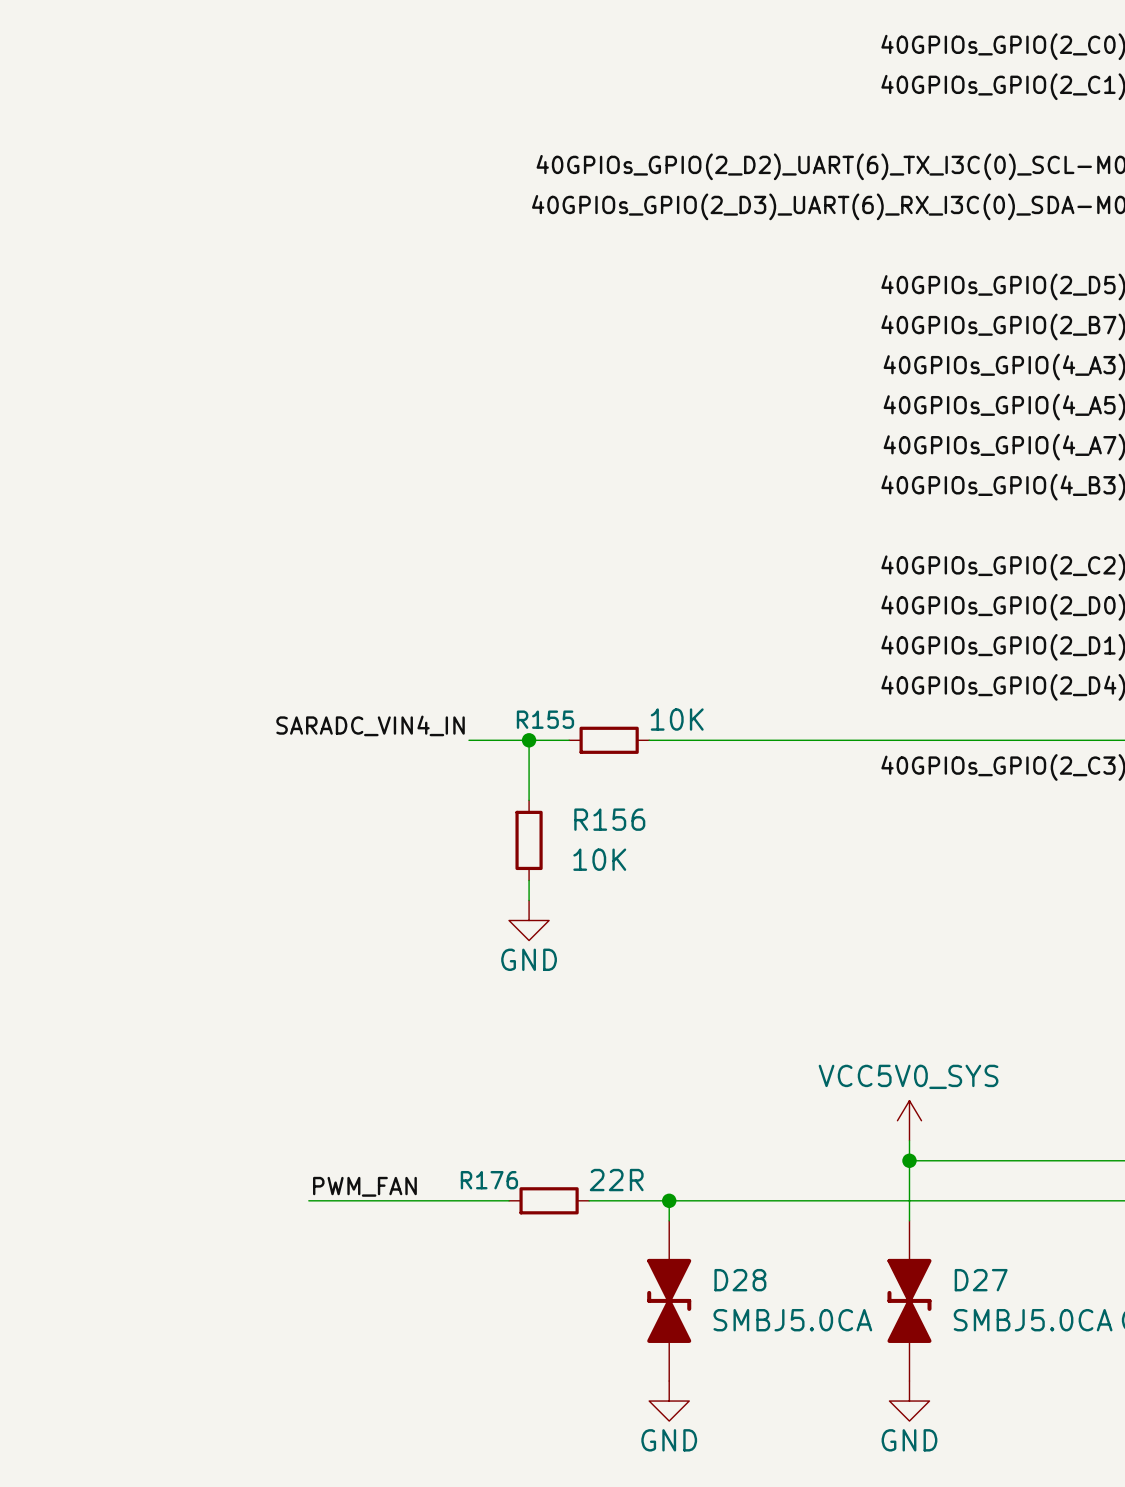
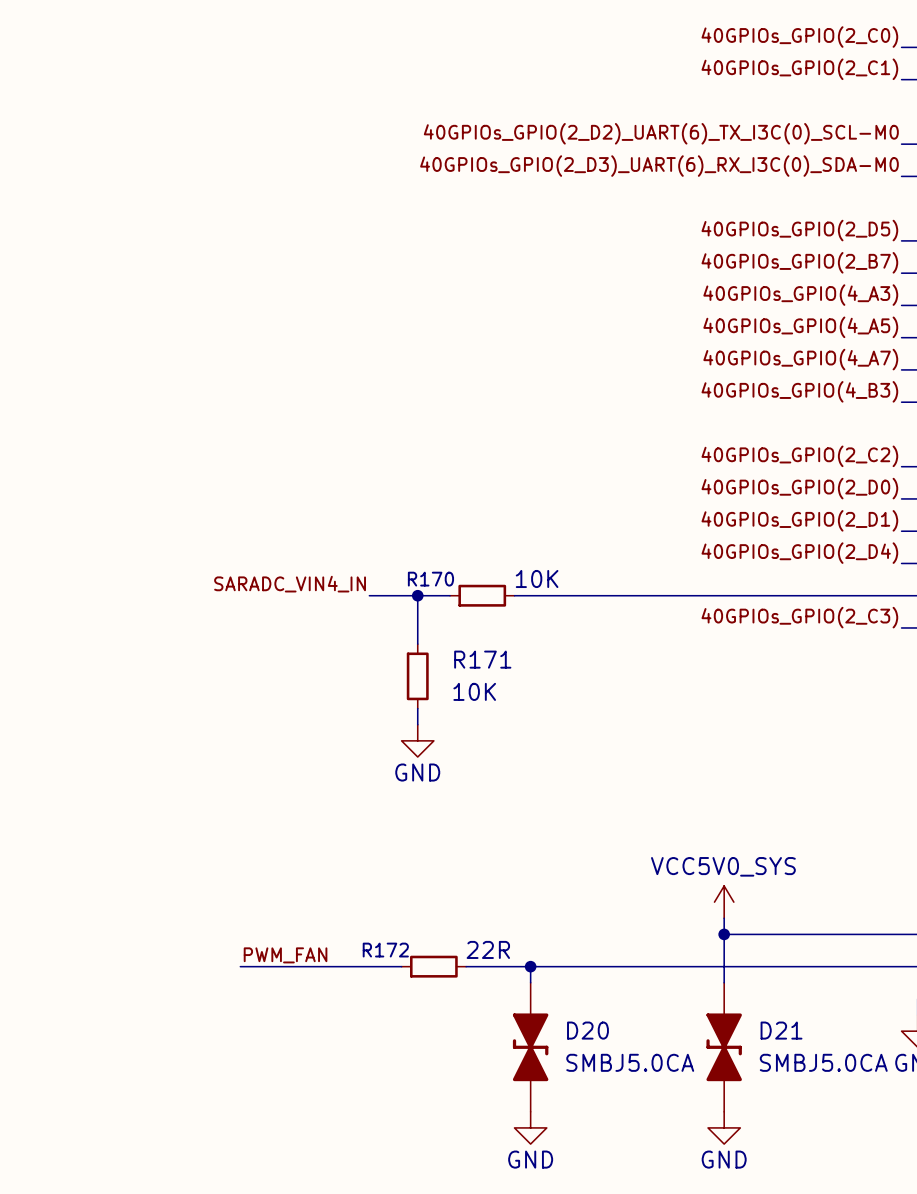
R155 name: R155 (545, 719) -> R170 (430, 579)
R156 name: R156 (609, 819) -> R171 (482, 659)
R176 name: R176 (489, 1180) -> R172 (385, 950)
D28 name: D28 (740, 1280) -> D20 (587, 1030)
D27 name: D27 (981, 1280) -> D21 (781, 1030)

